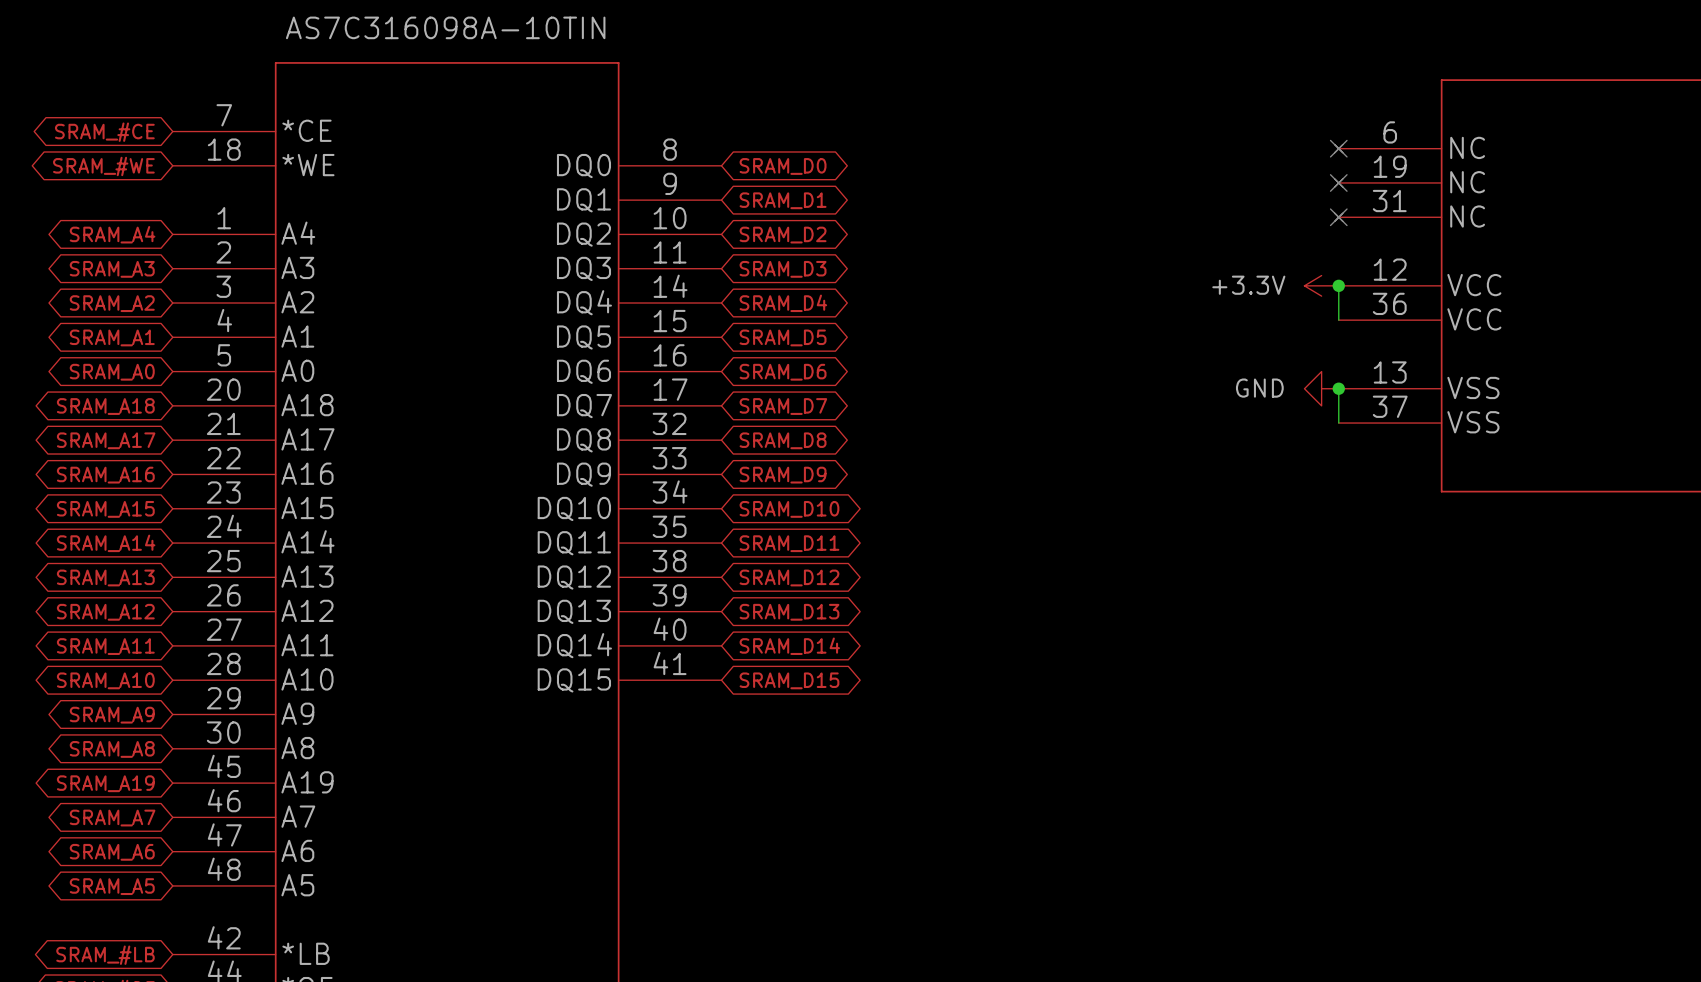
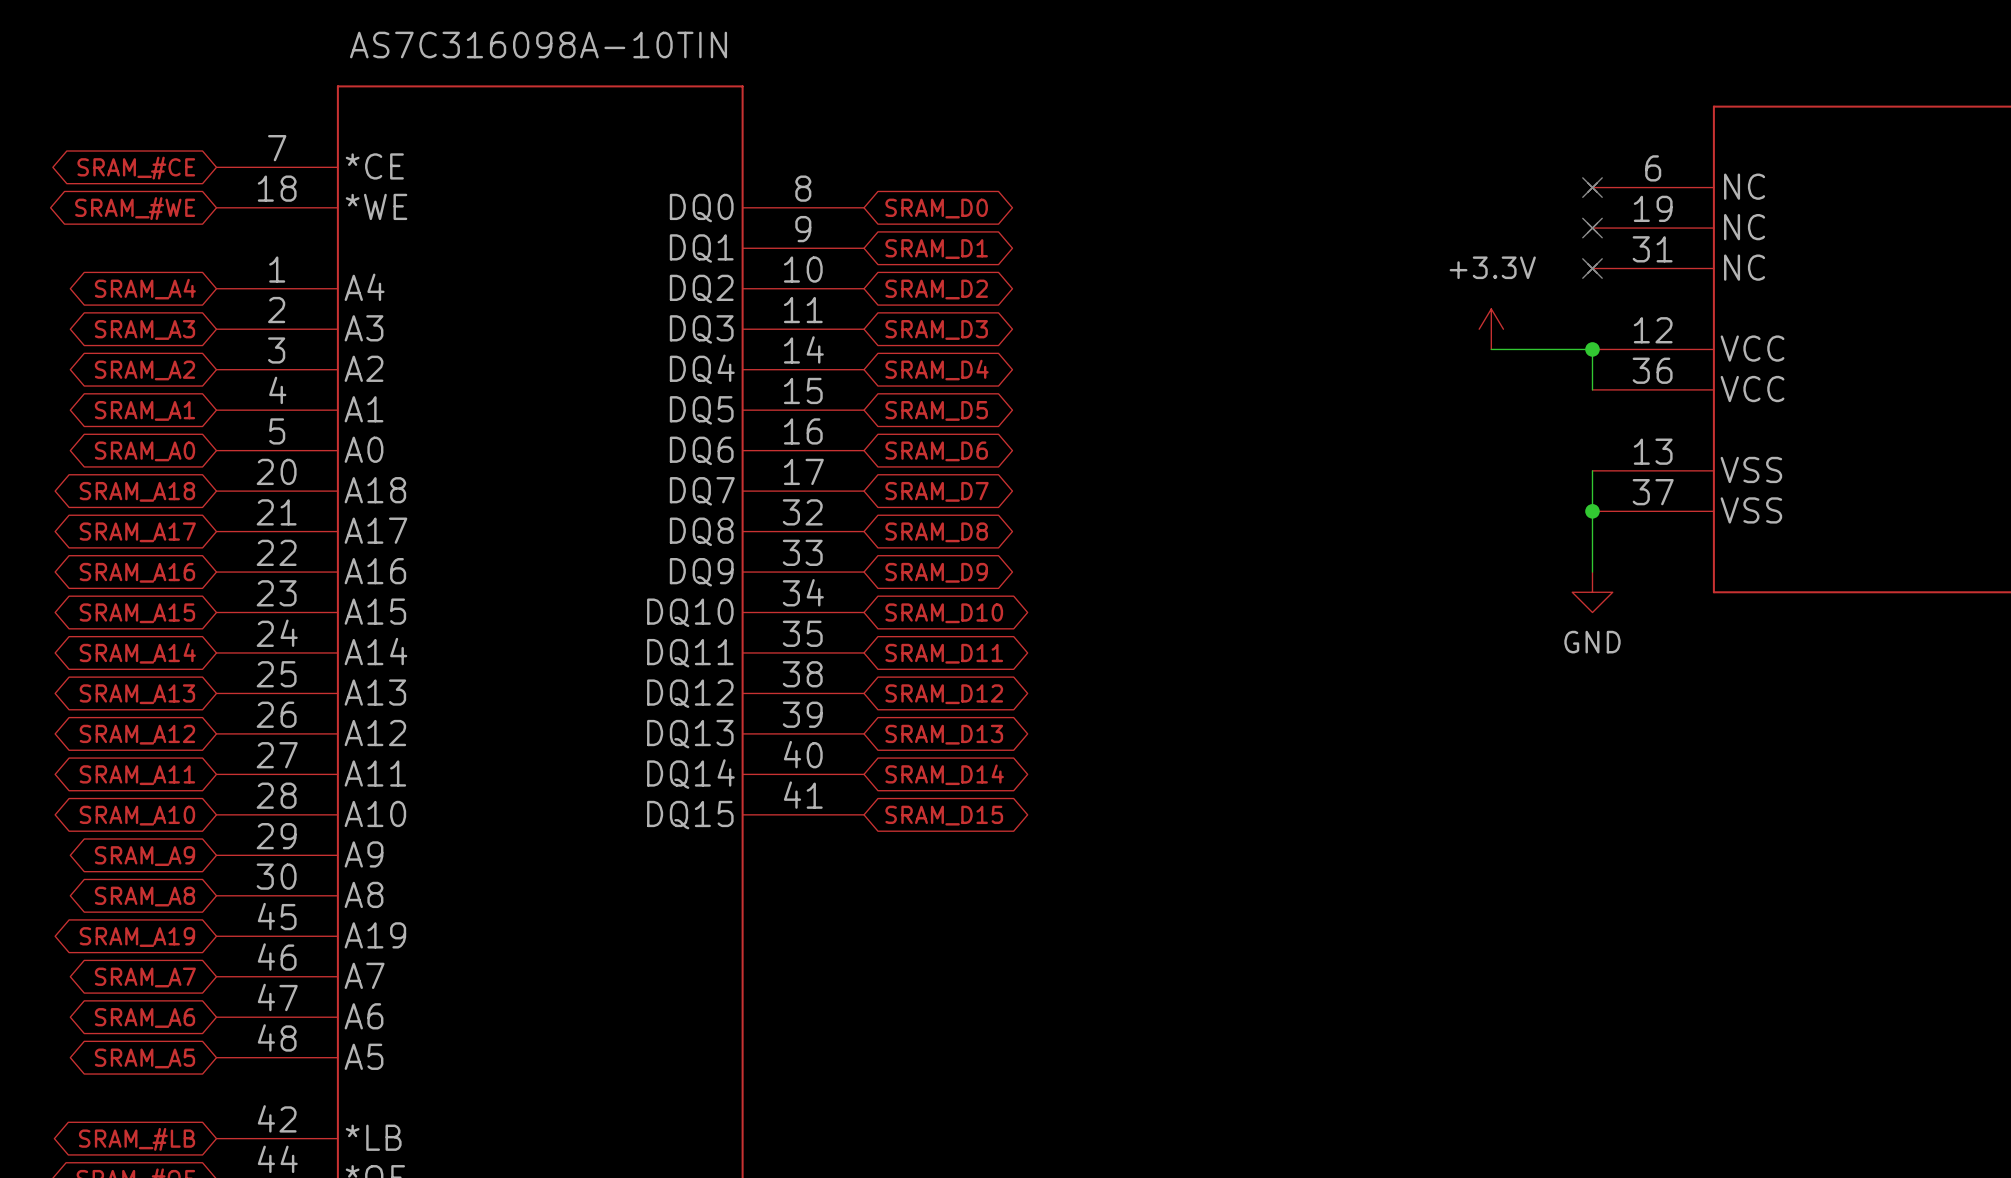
power symbol text position: +3.3V (1248, 285) -> +3.3V (1492, 267)
wire: none -> (1491, 349) (1592, 349)
power symbol rotation: 0° (1321, 285) -> 90° clockwise (1491, 329)
power symbol position: +3.3V (1321, 285) -> +3.3V (1491, 329)
power symbol rotation: 0° (1321, 388) -> 90° counterclockwise (1592, 592)
power symbol position: GND (1321, 388) -> GND (1592, 592)
junction position: (1338, 388) -> (1592, 511)
wire: none -> (1592, 511) (1592, 572)

